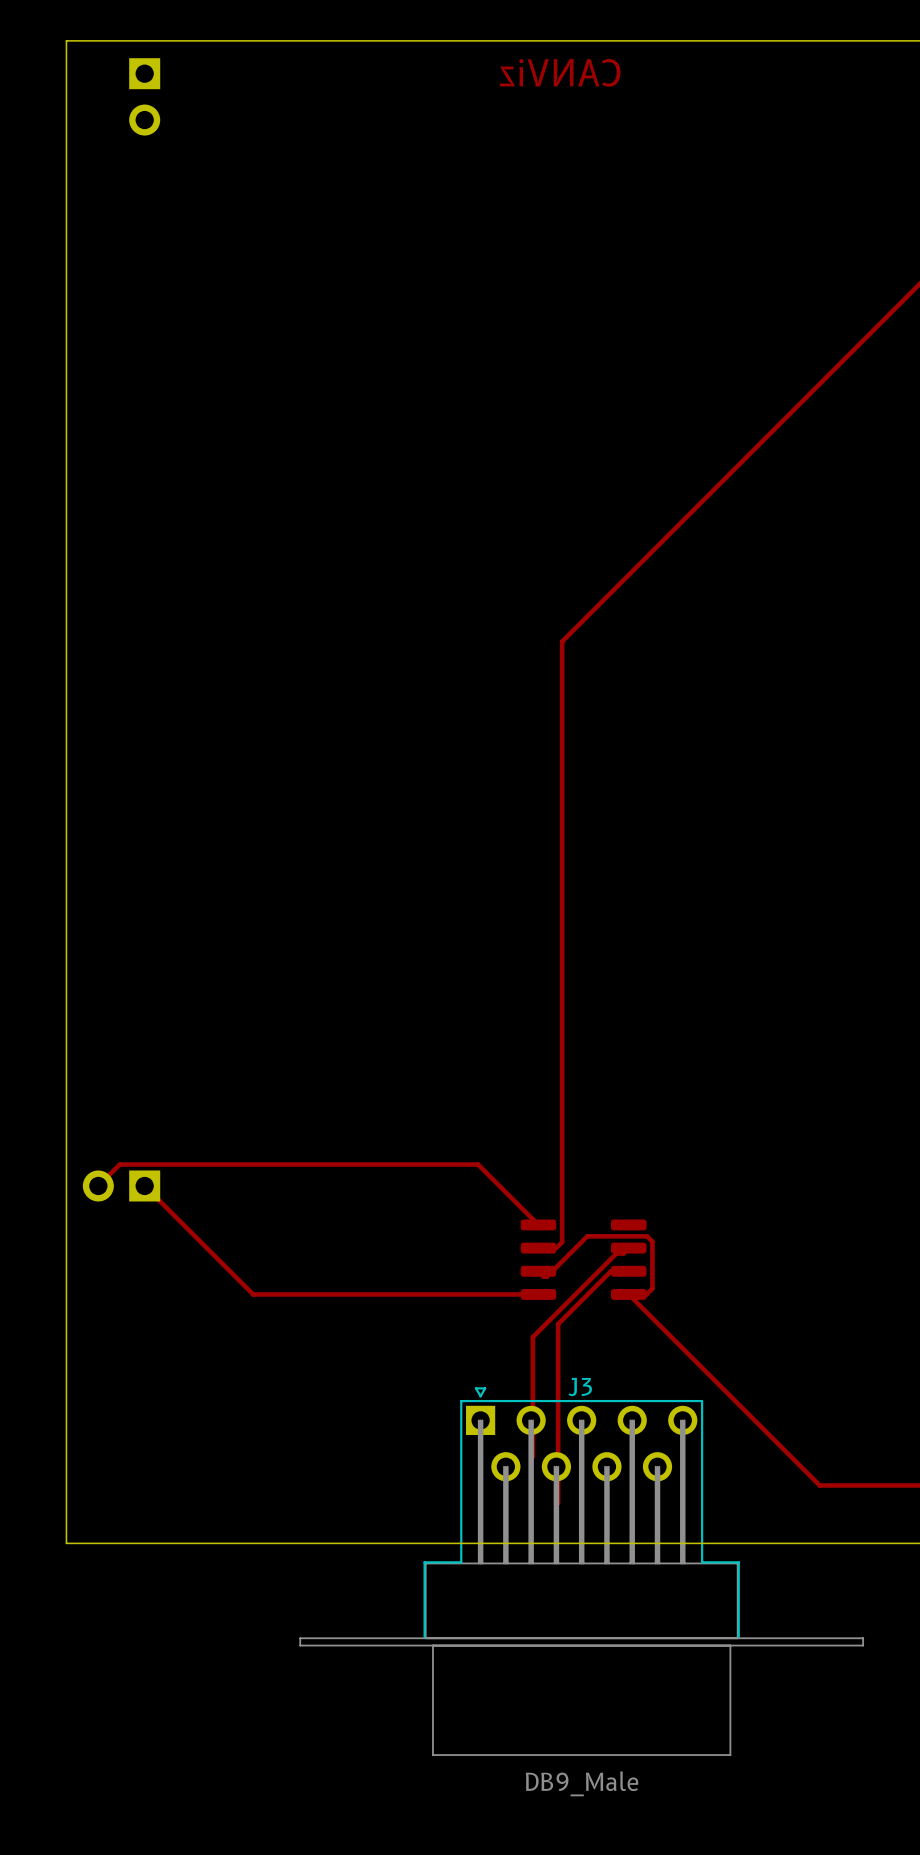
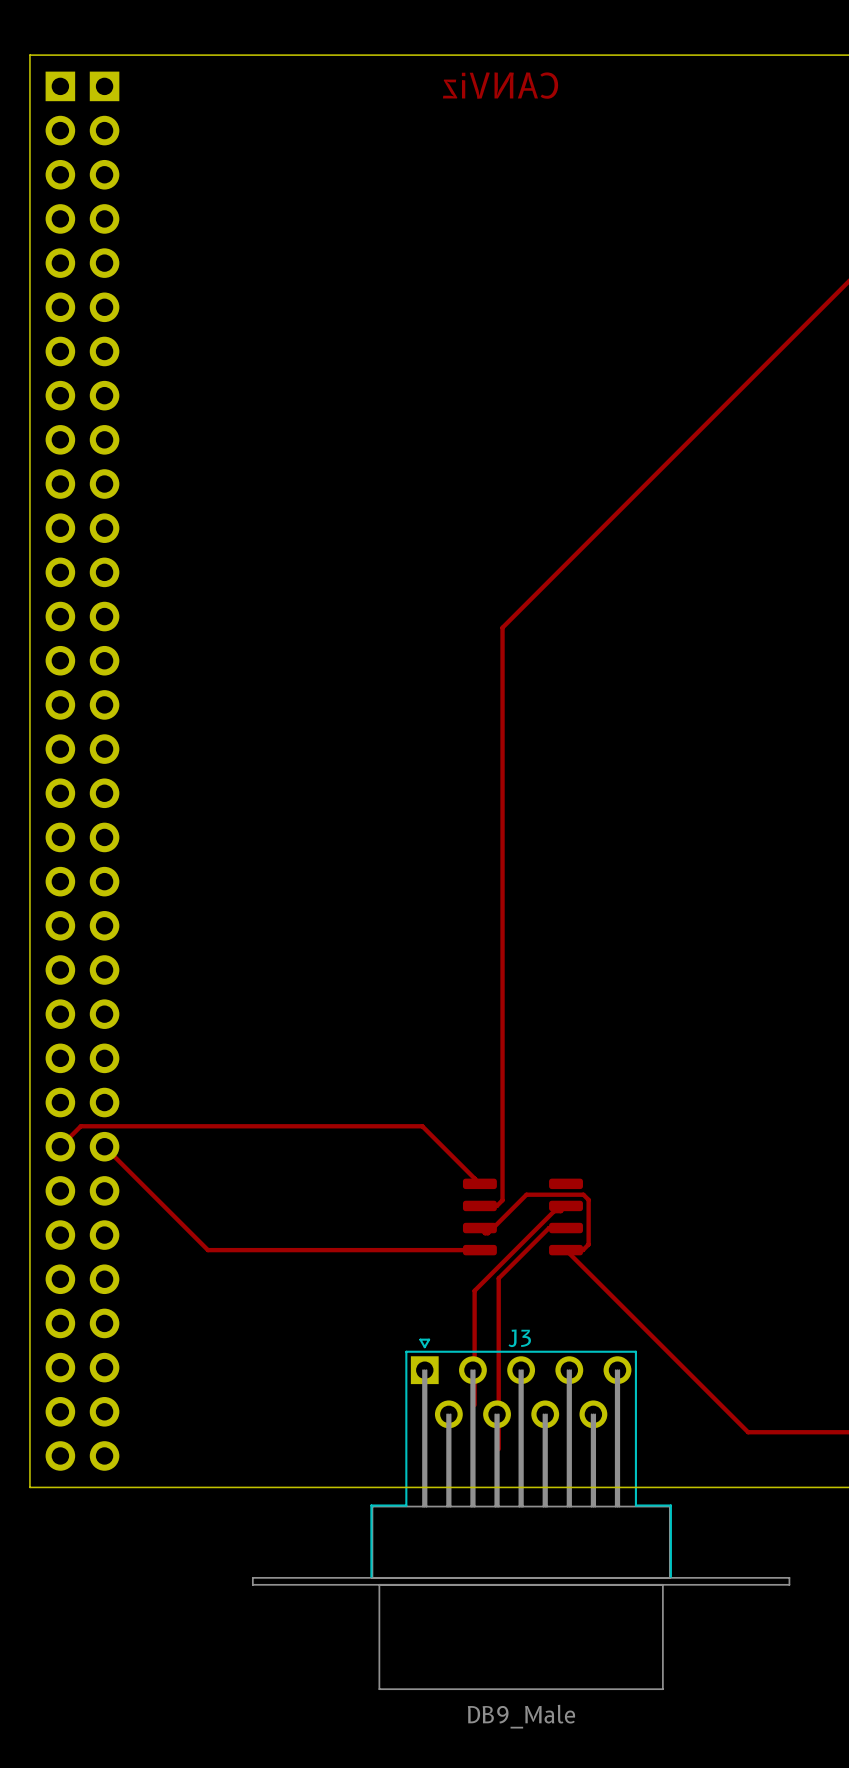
part: none -> (60, 771)
part: none -> (104, 771)
part: (121, 1185) -> none

